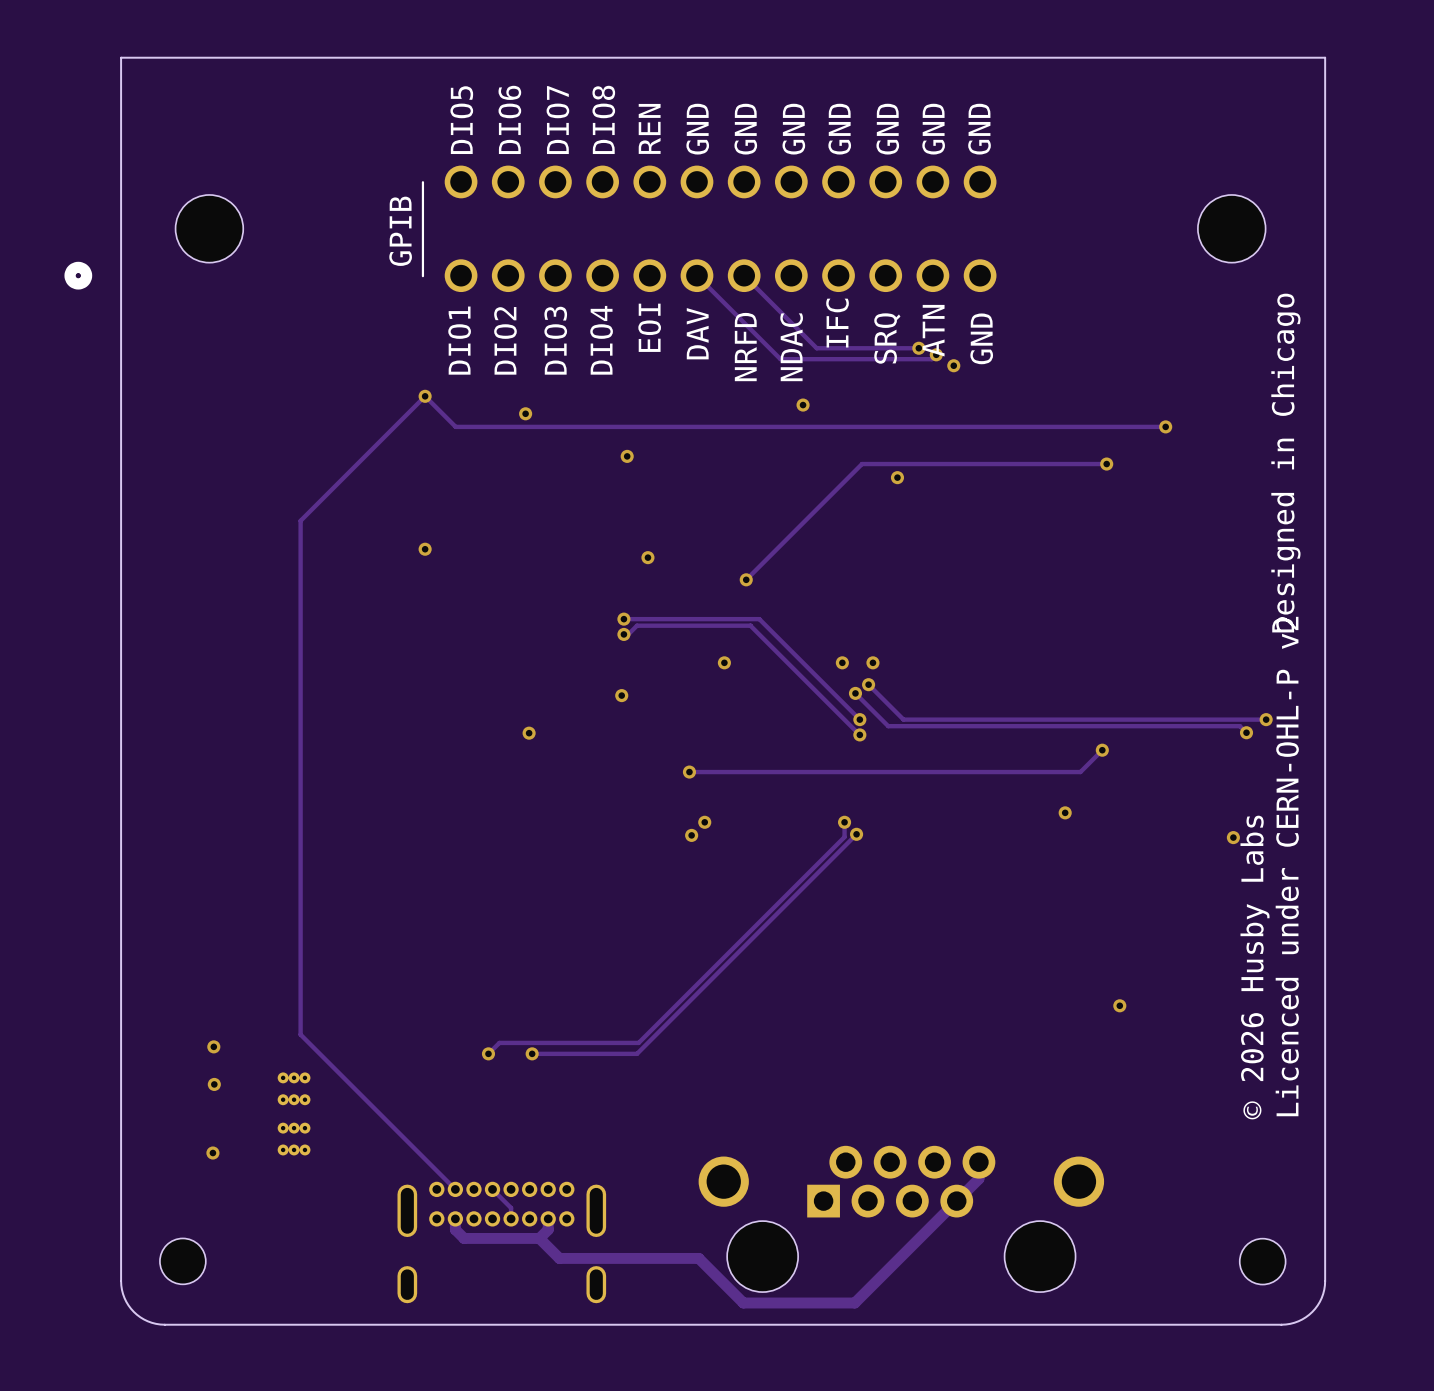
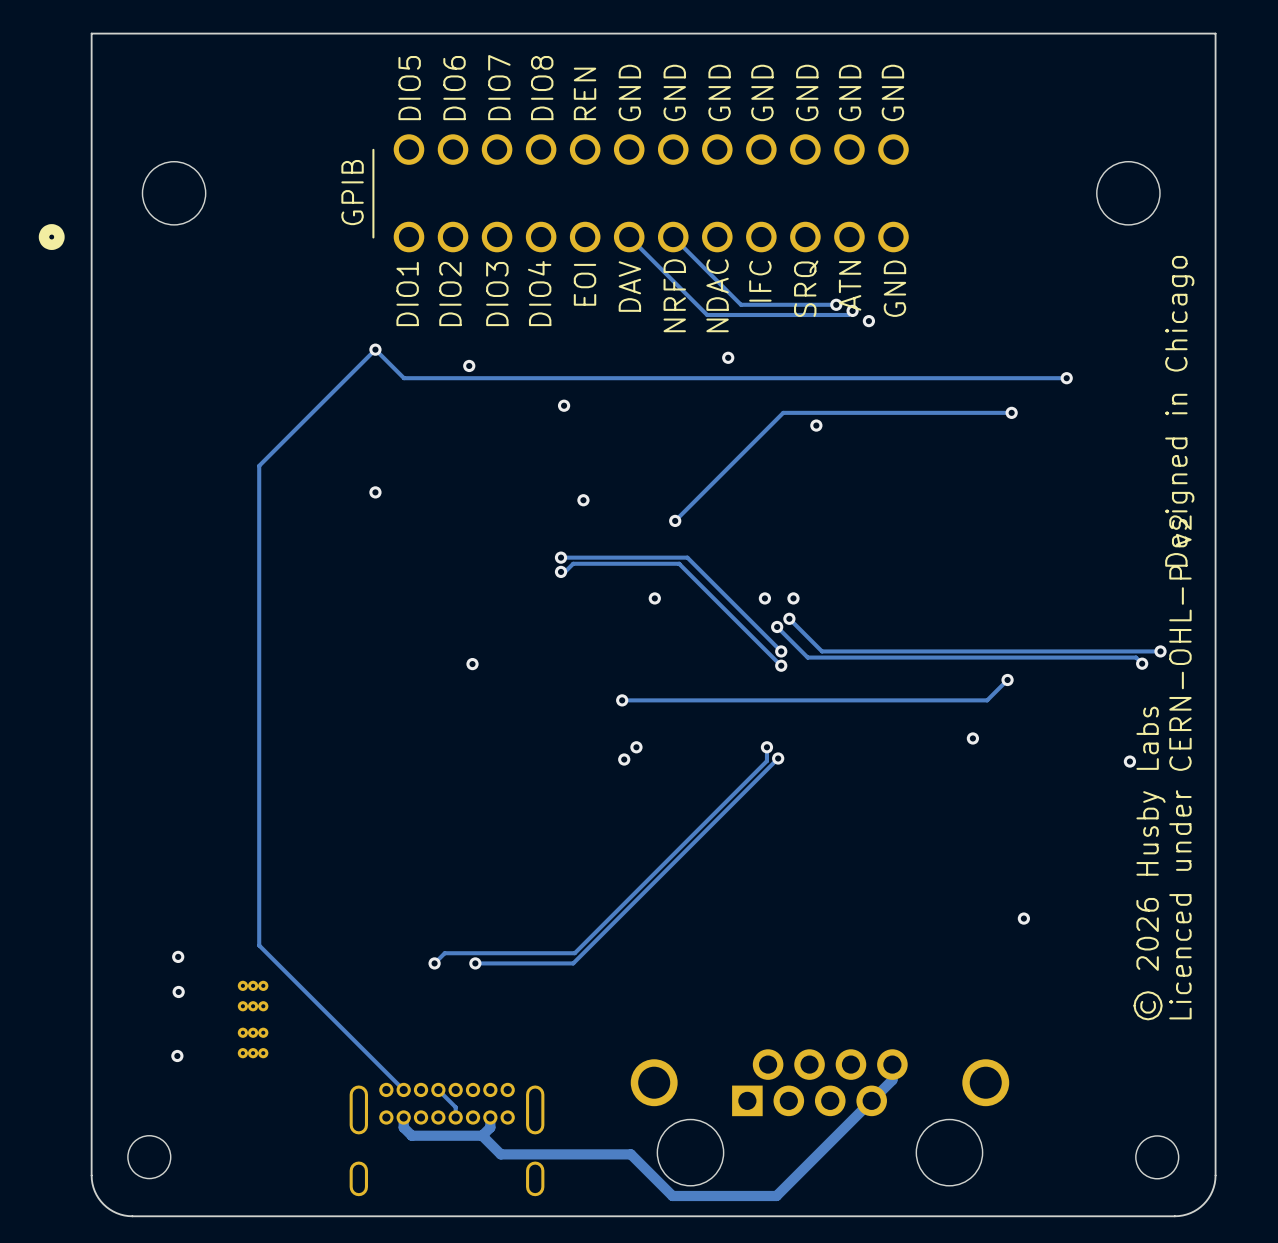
via: (621, 695) -> none

